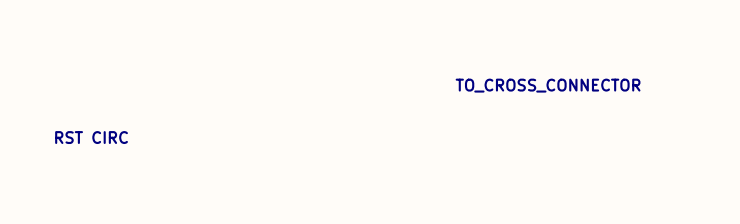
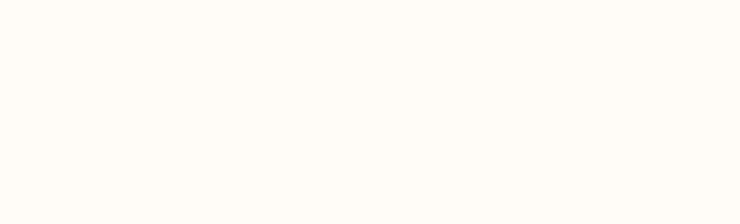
text: TO_CROSS_CONNECTOR (548, 85) -> none
text: RST CIRC (91, 137) -> none

